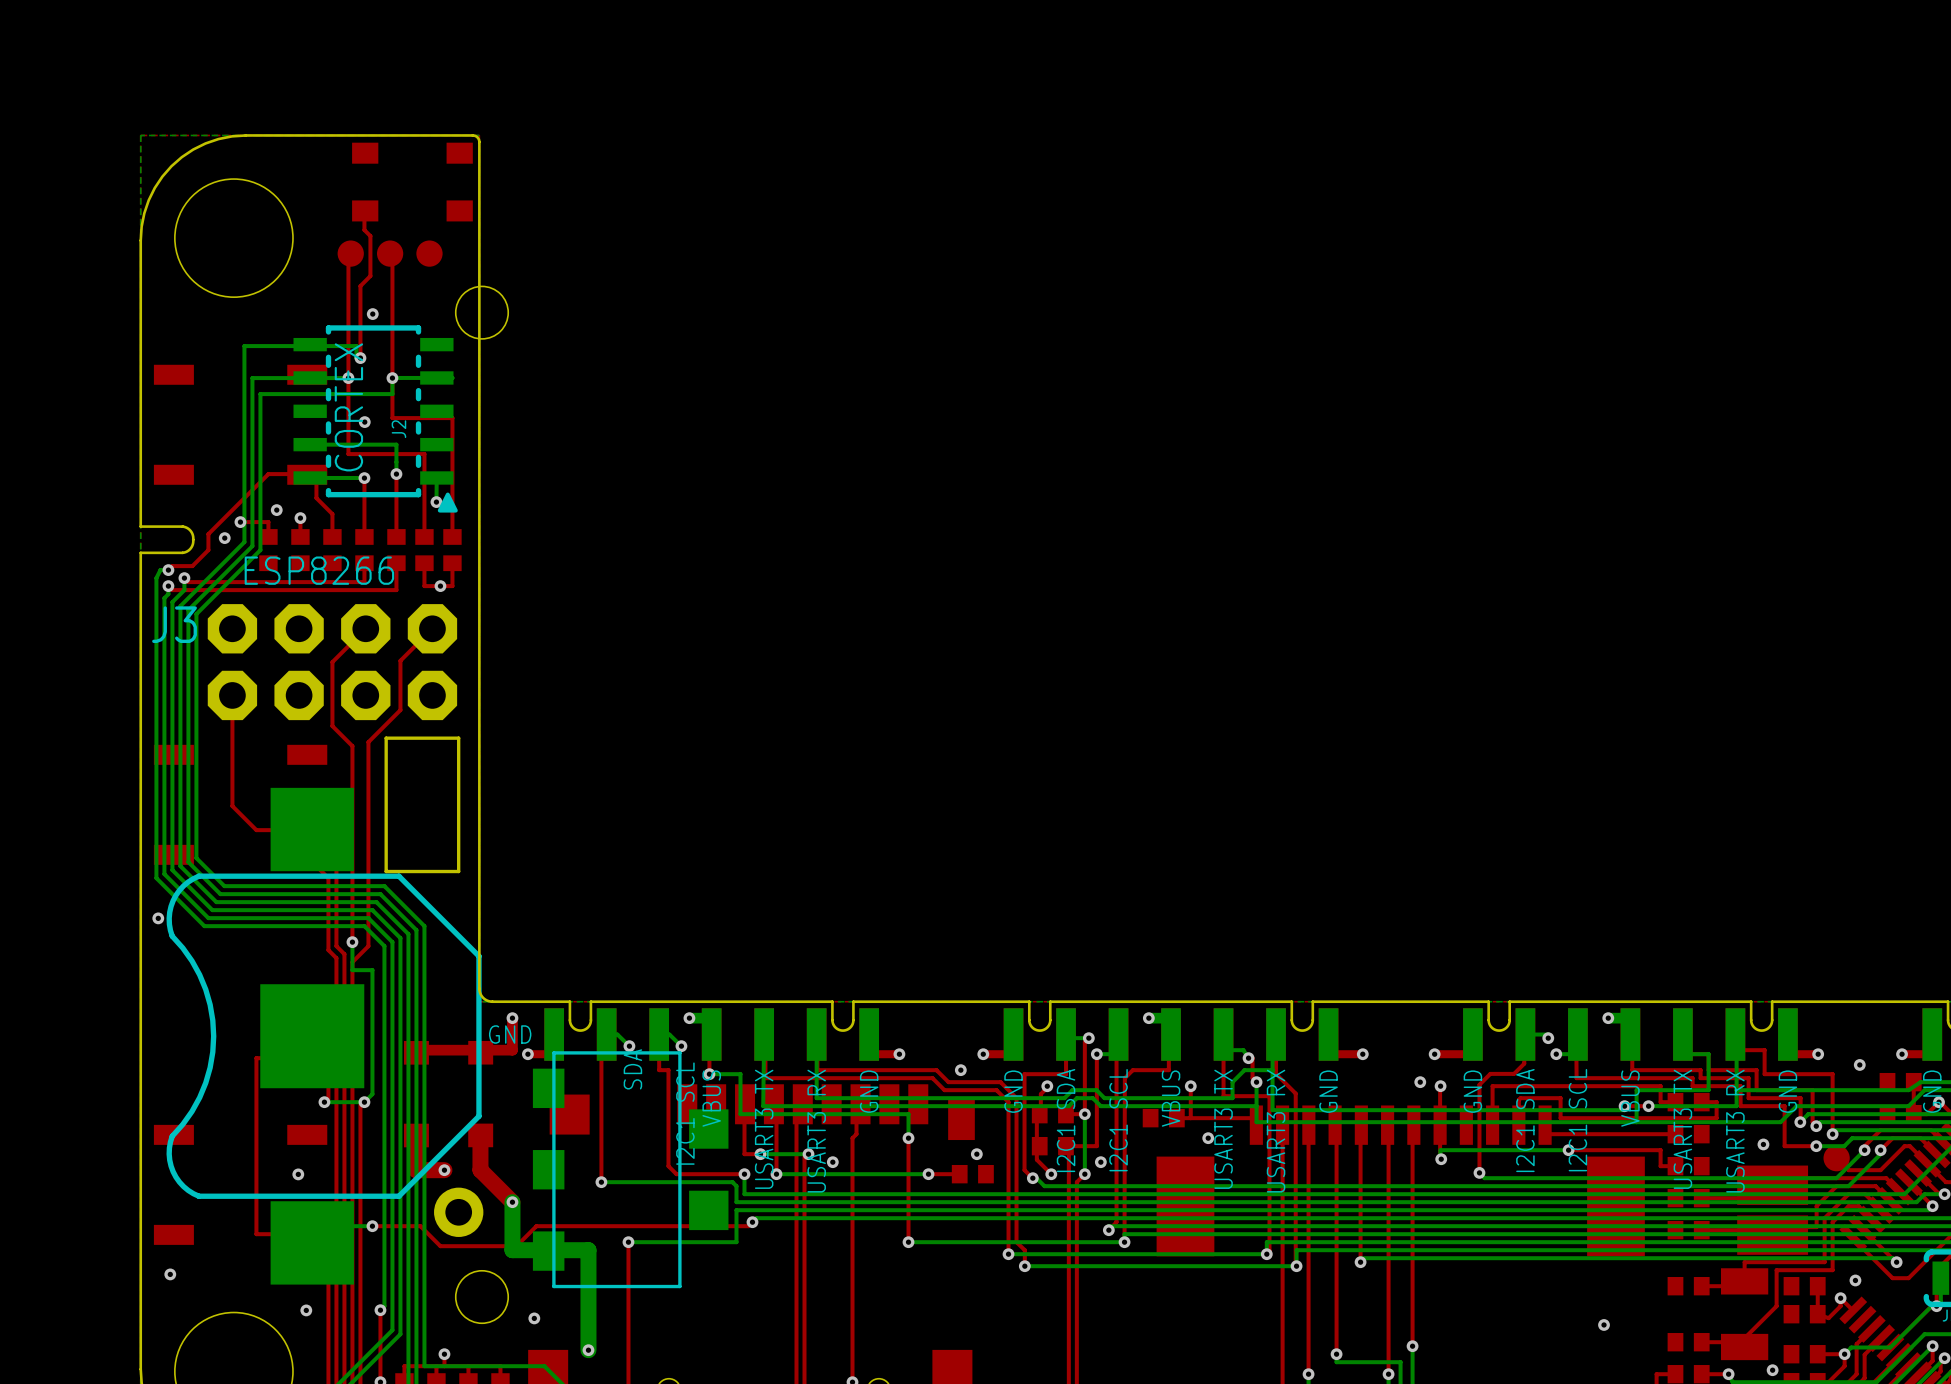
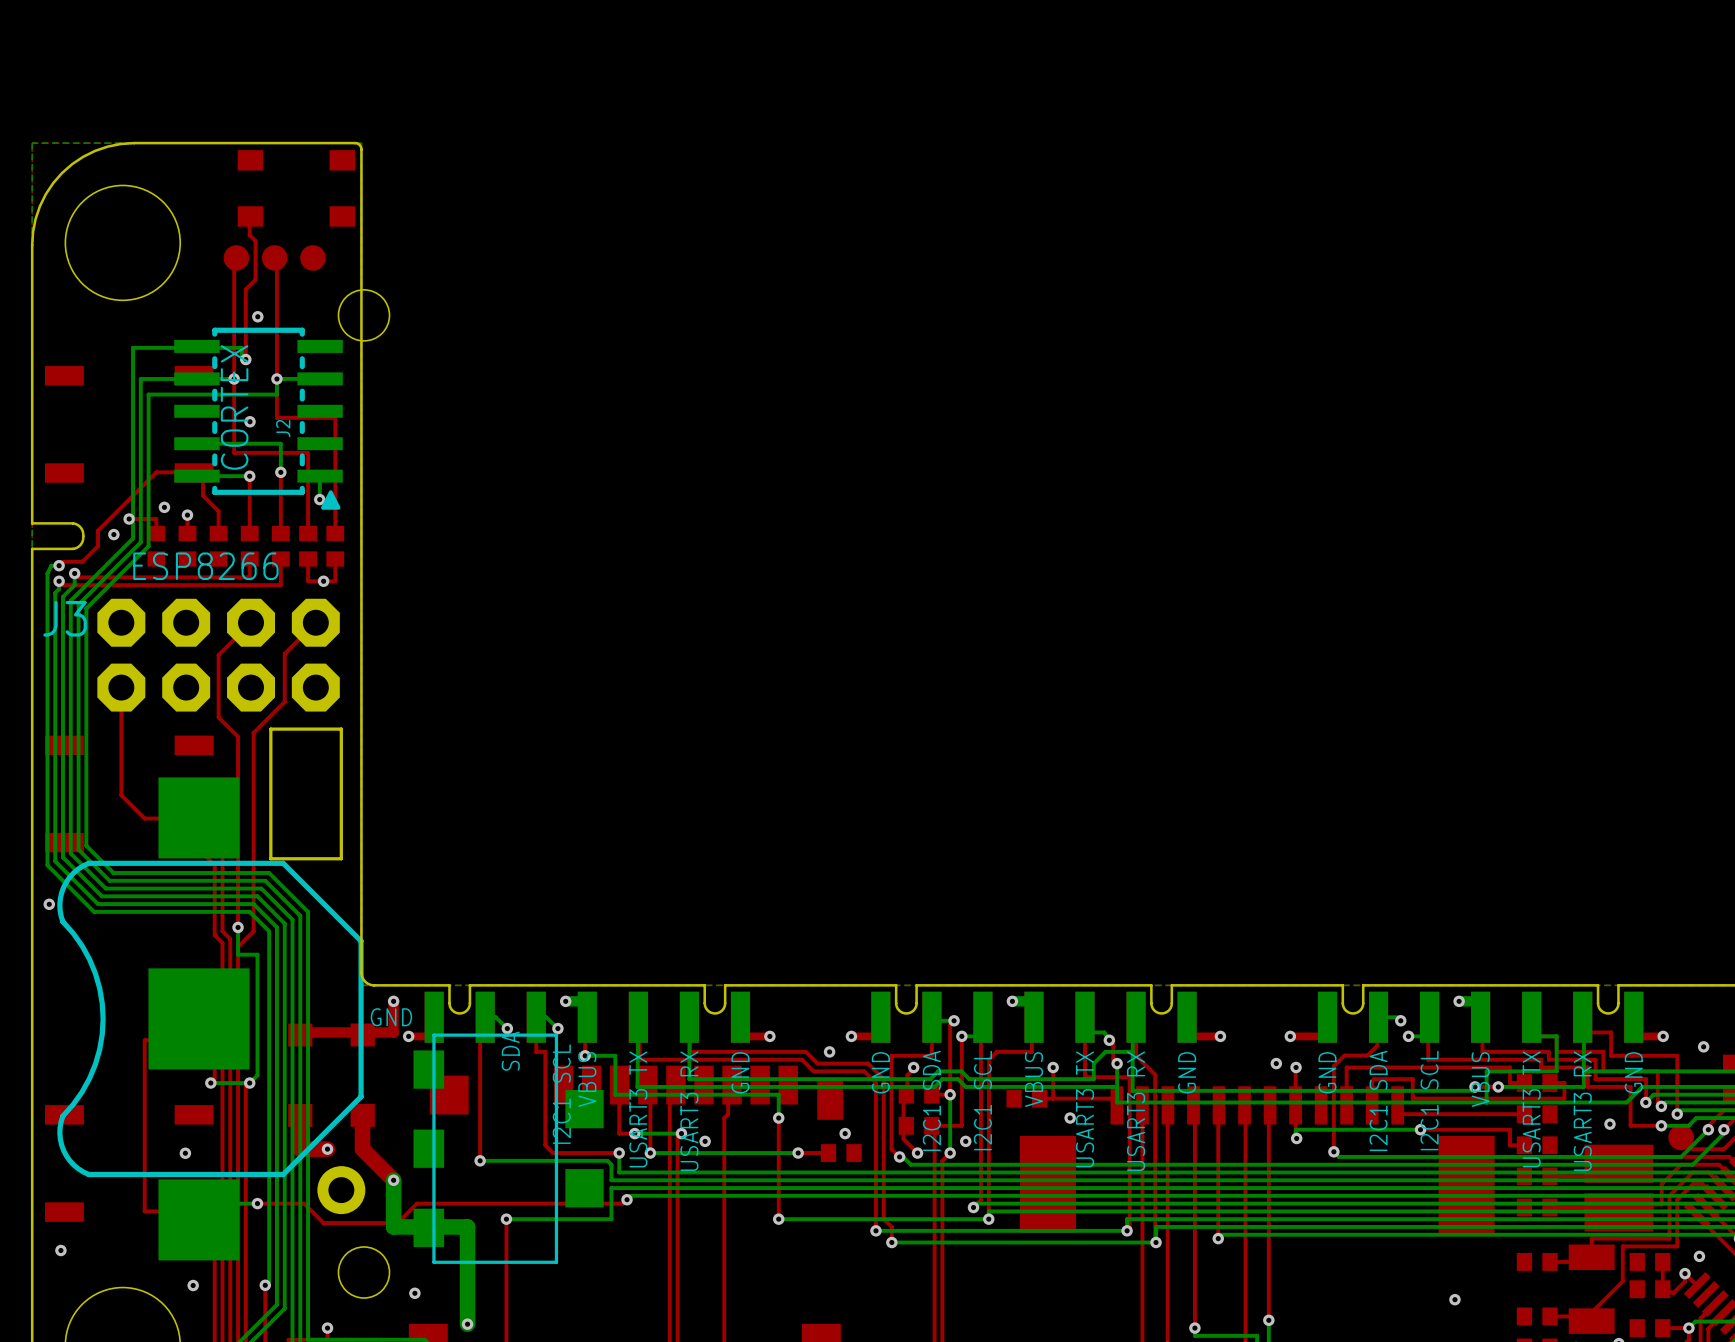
J2 footprint: [293, 325, 454, 498] -> [174, 327, 343, 495]

